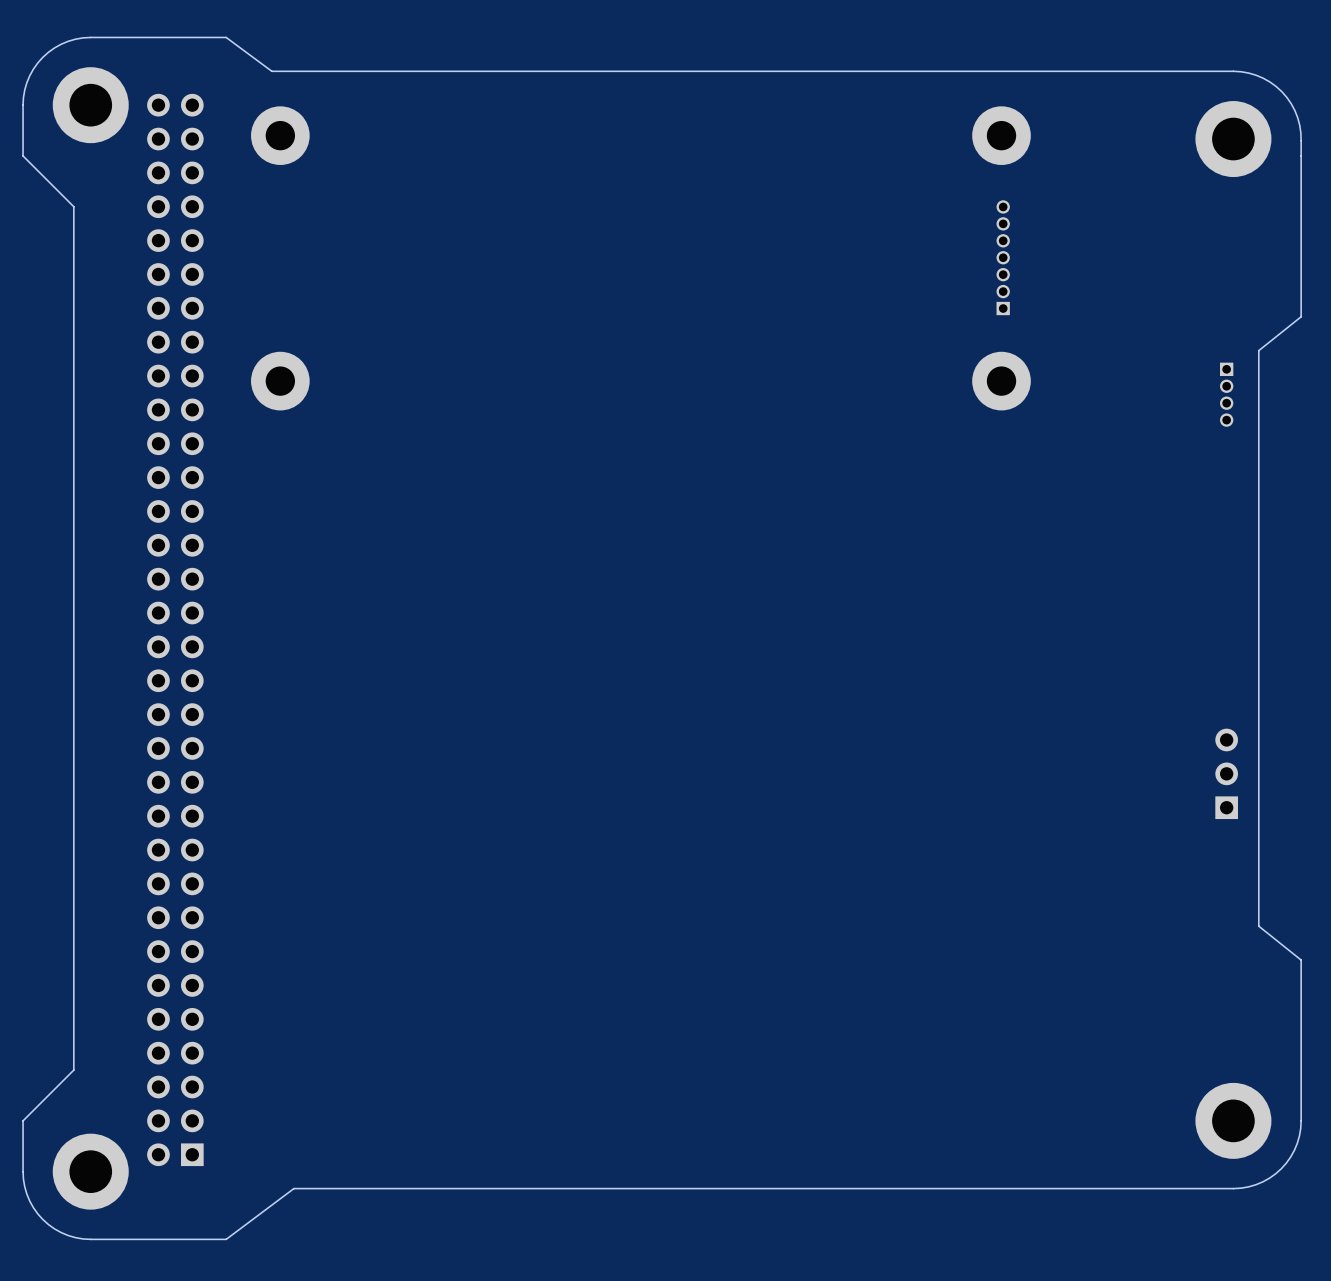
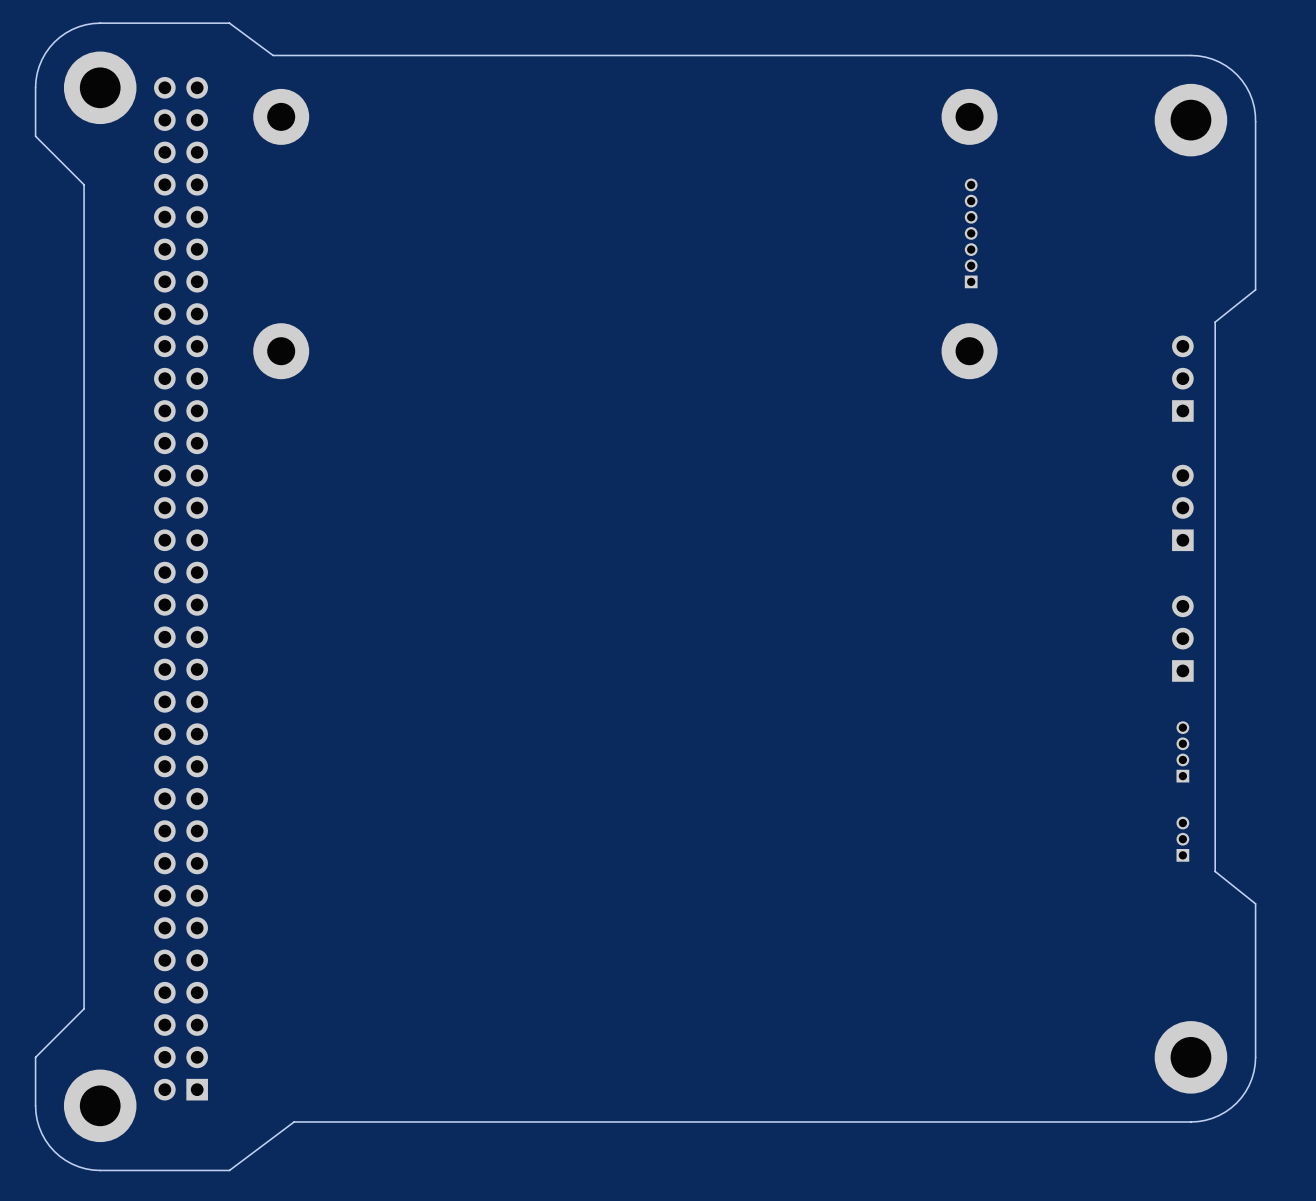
part: (1226, 394) -> none
part: none -> (1182, 378)
part: none -> (1182, 507)
part position: (1226, 773) -> (1182, 638)
part: none -> (1182, 751)
part: none -> (1182, 839)

